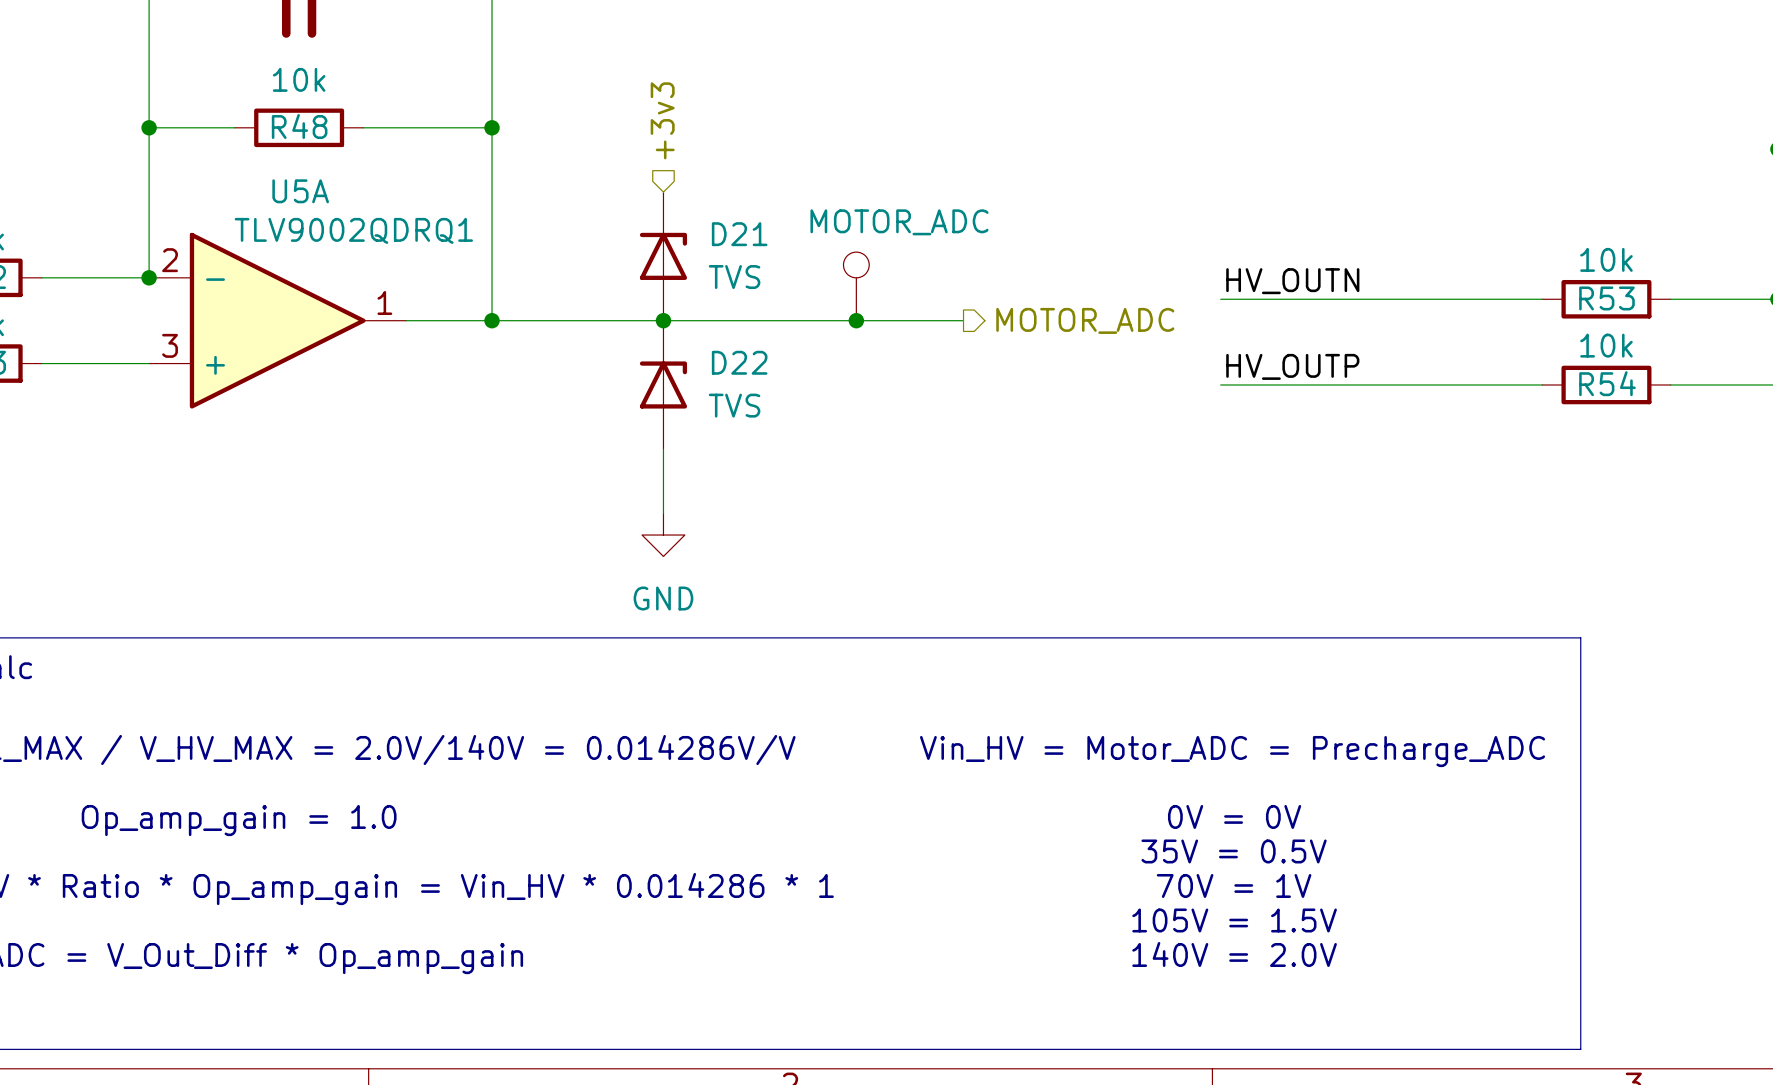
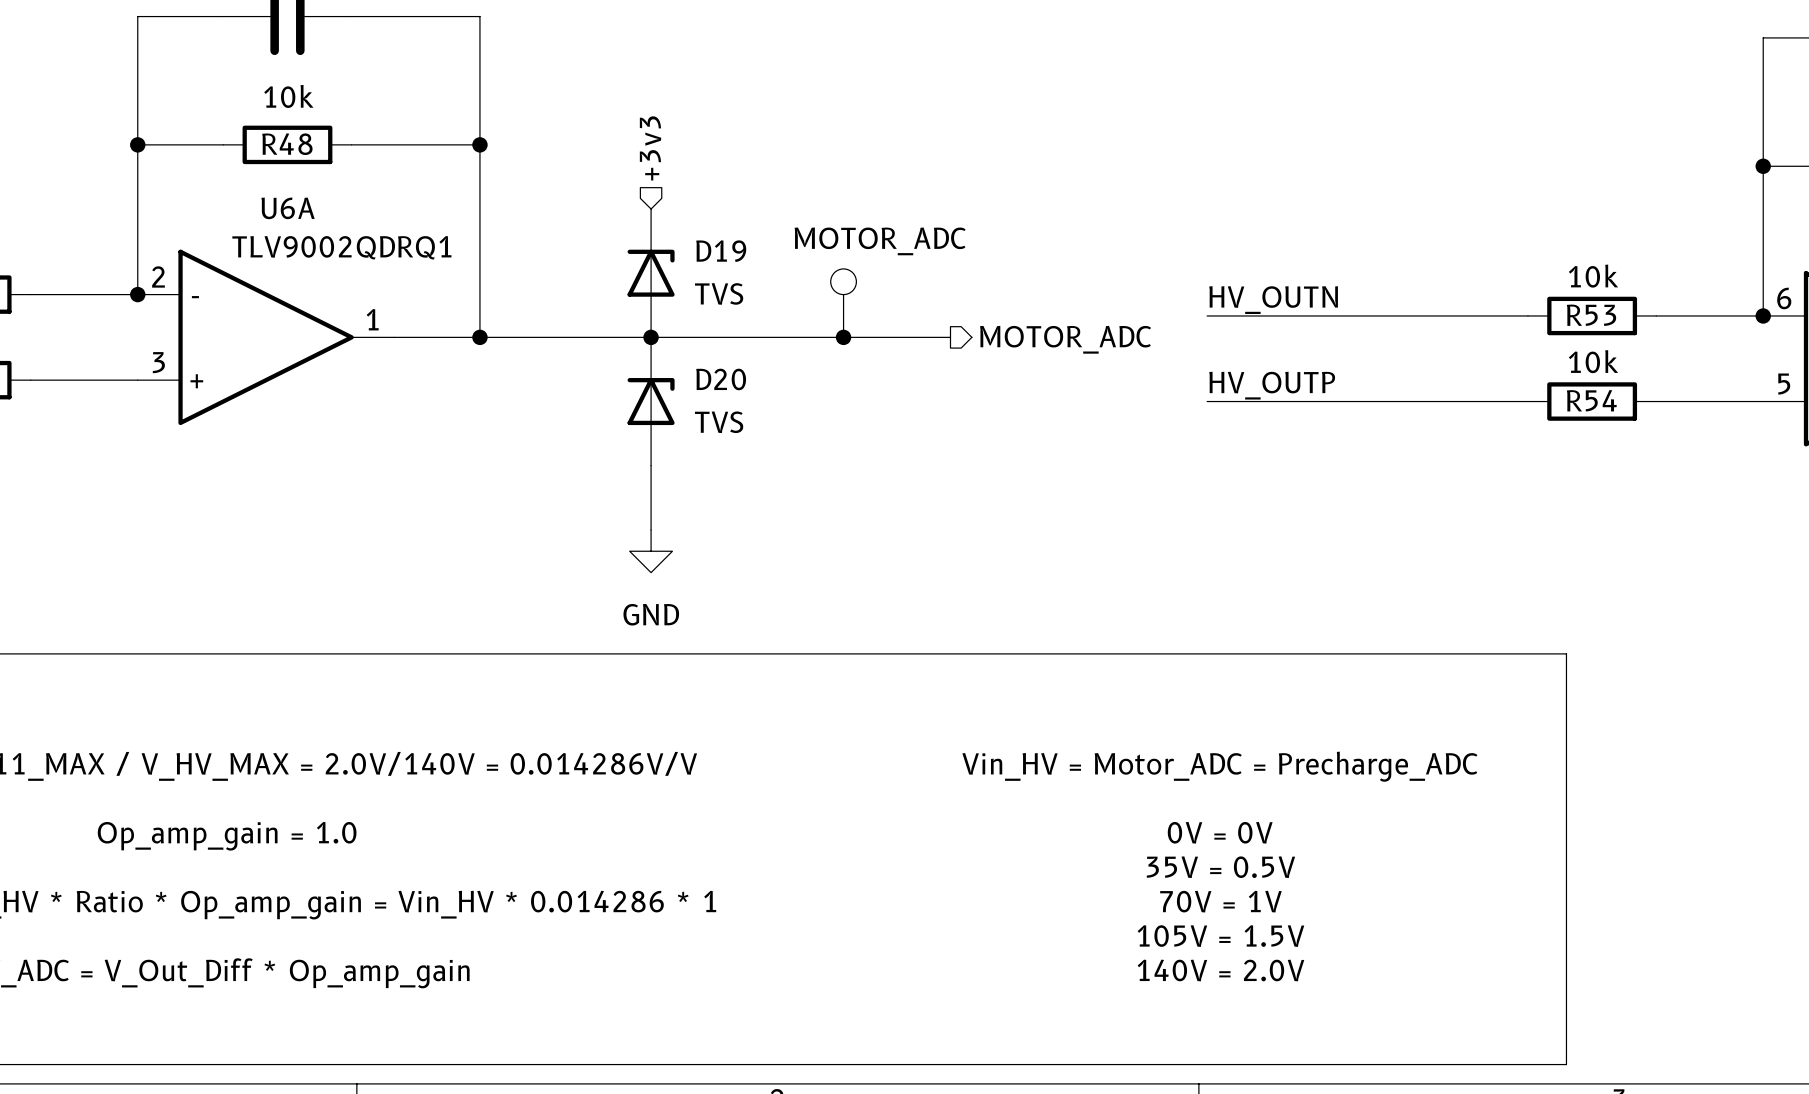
U5A name: U5A (300, 191) -> U6A (288, 208)
D21 name: D21 (739, 234) -> D19 (721, 251)
D22 name: D22 (739, 362) -> D20 (721, 379)

